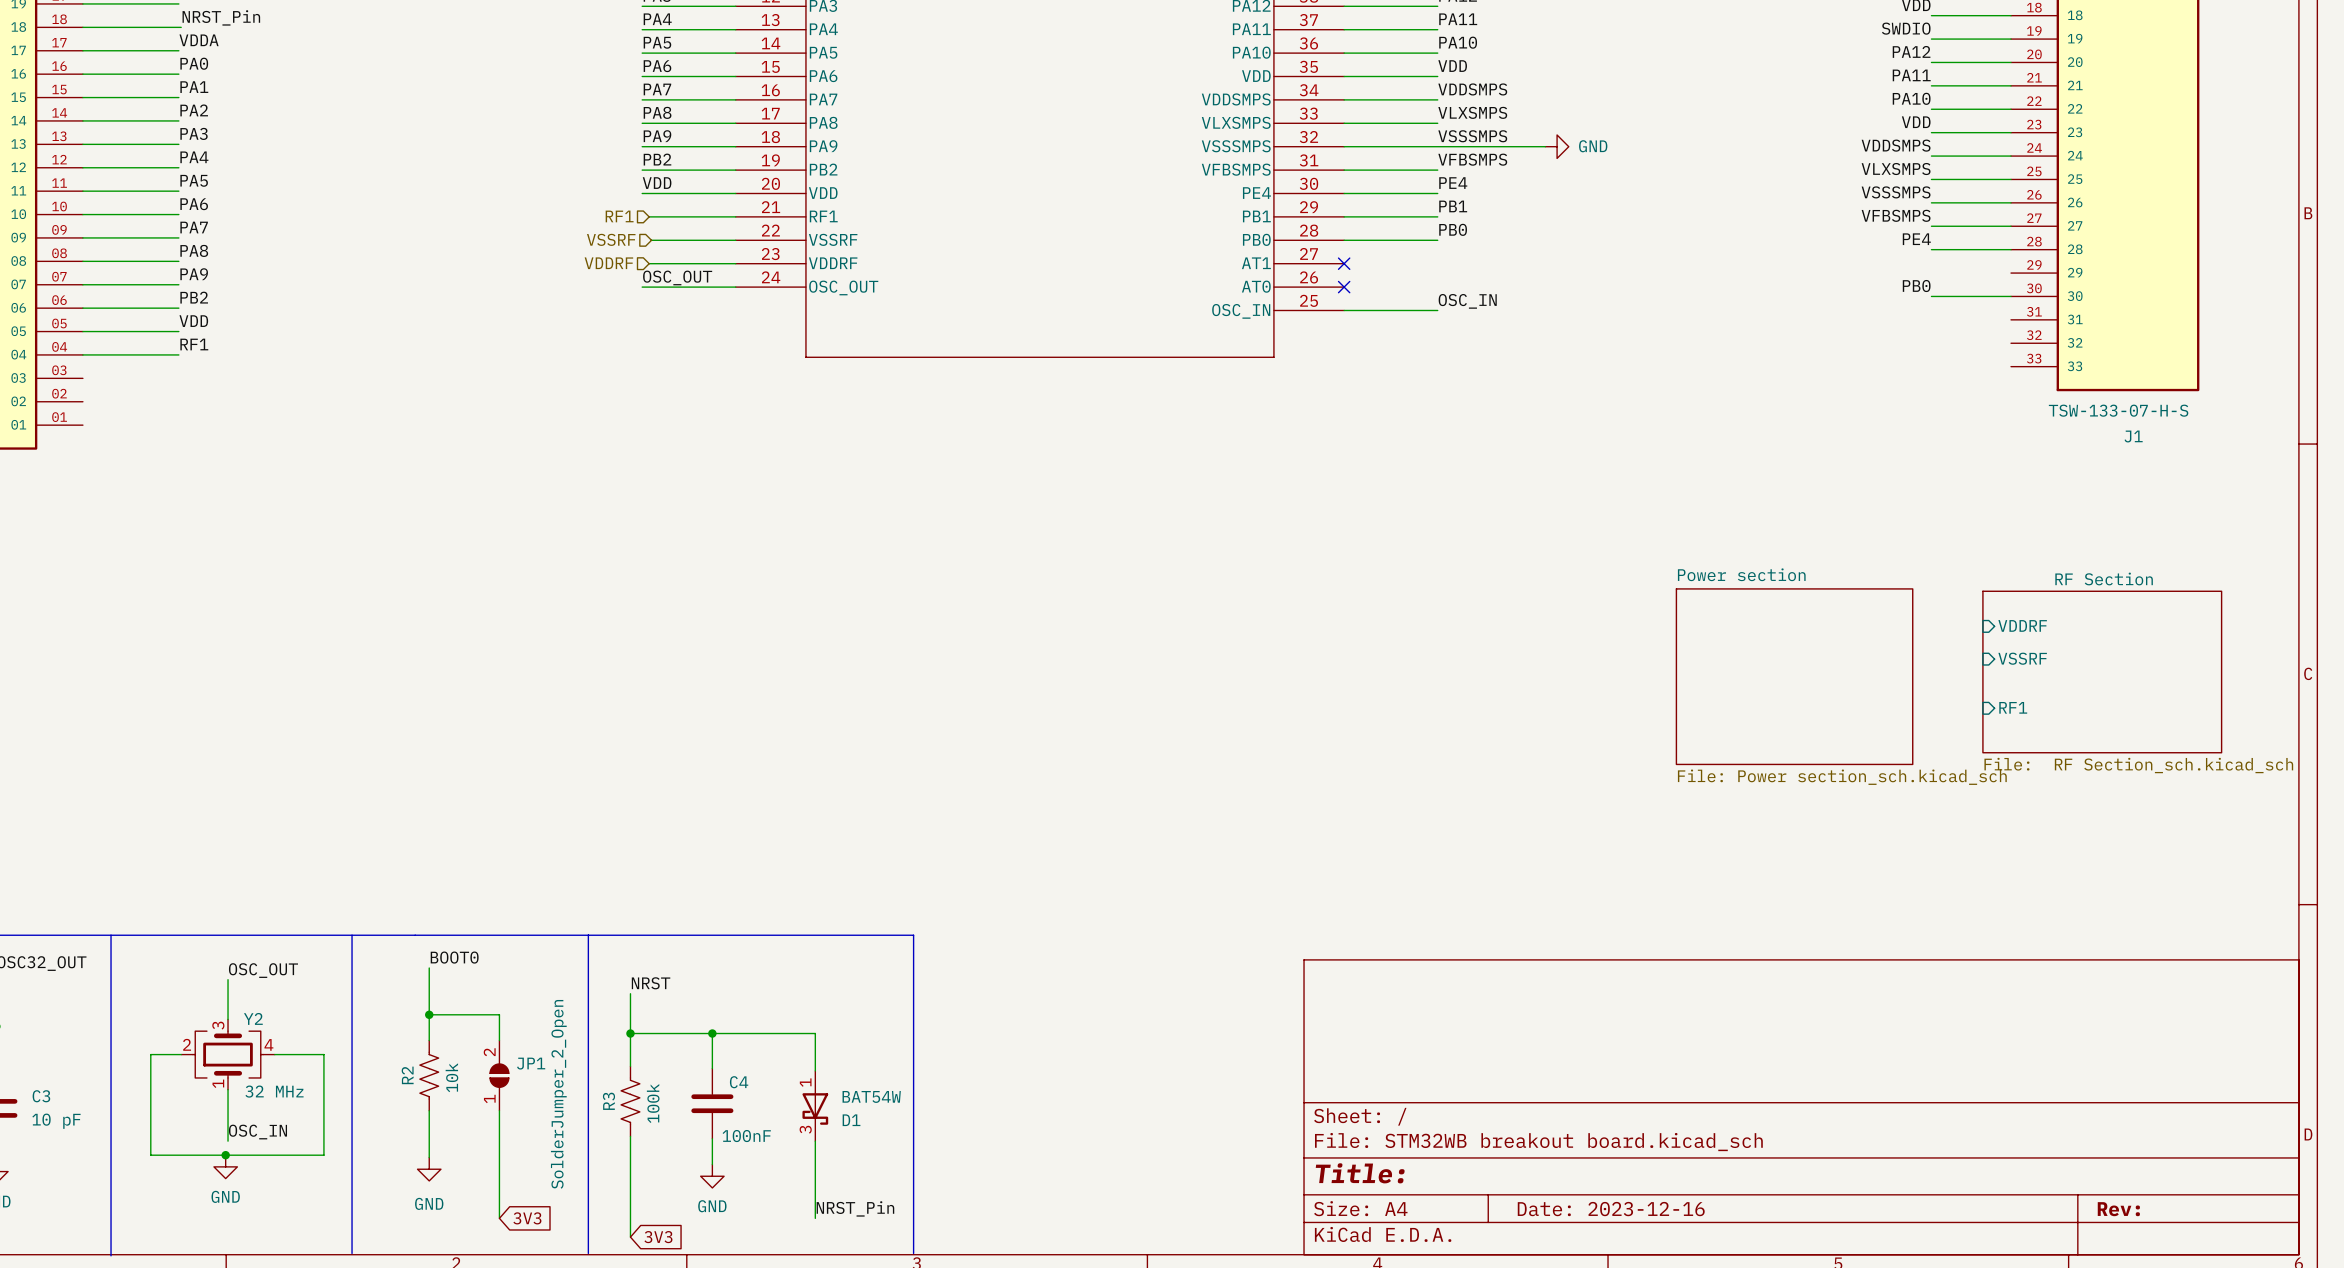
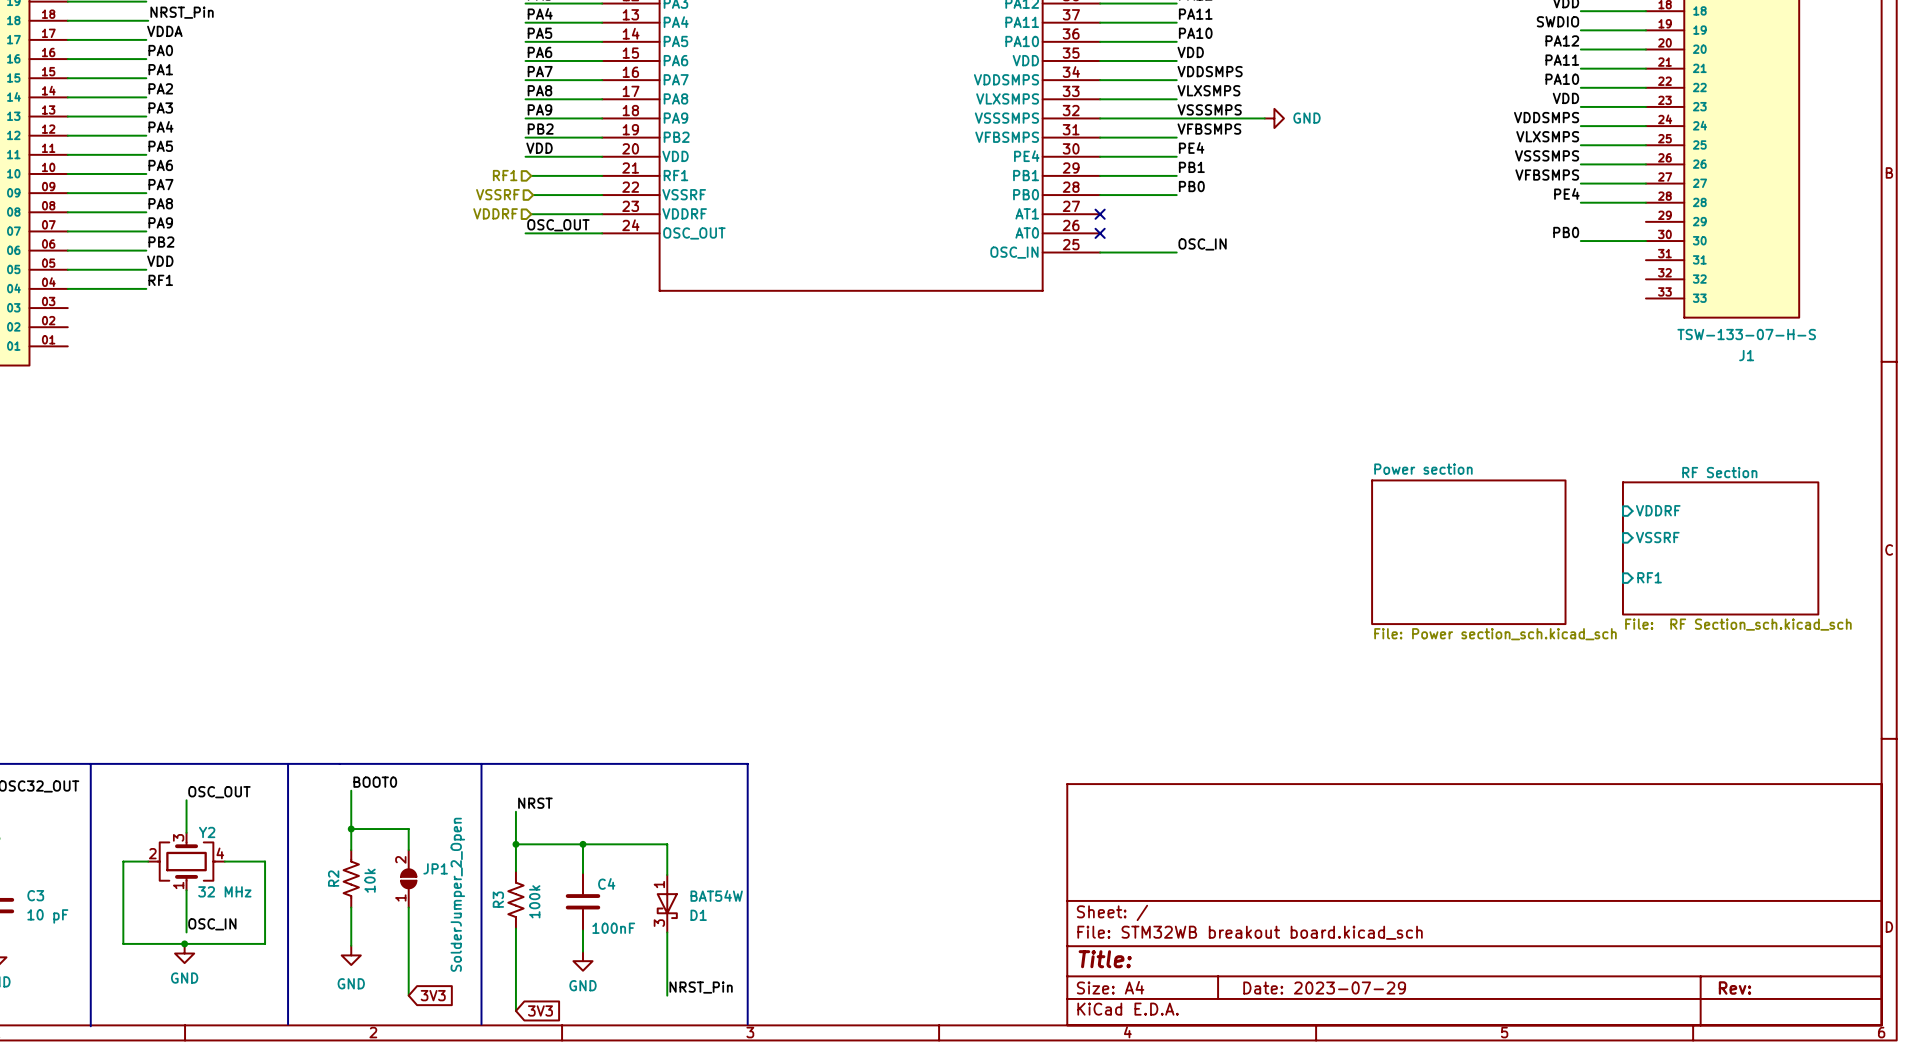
title block: Date: 2023-12-16 (1611, 1209) -> Date: 2023-07-29 (1324, 988)

